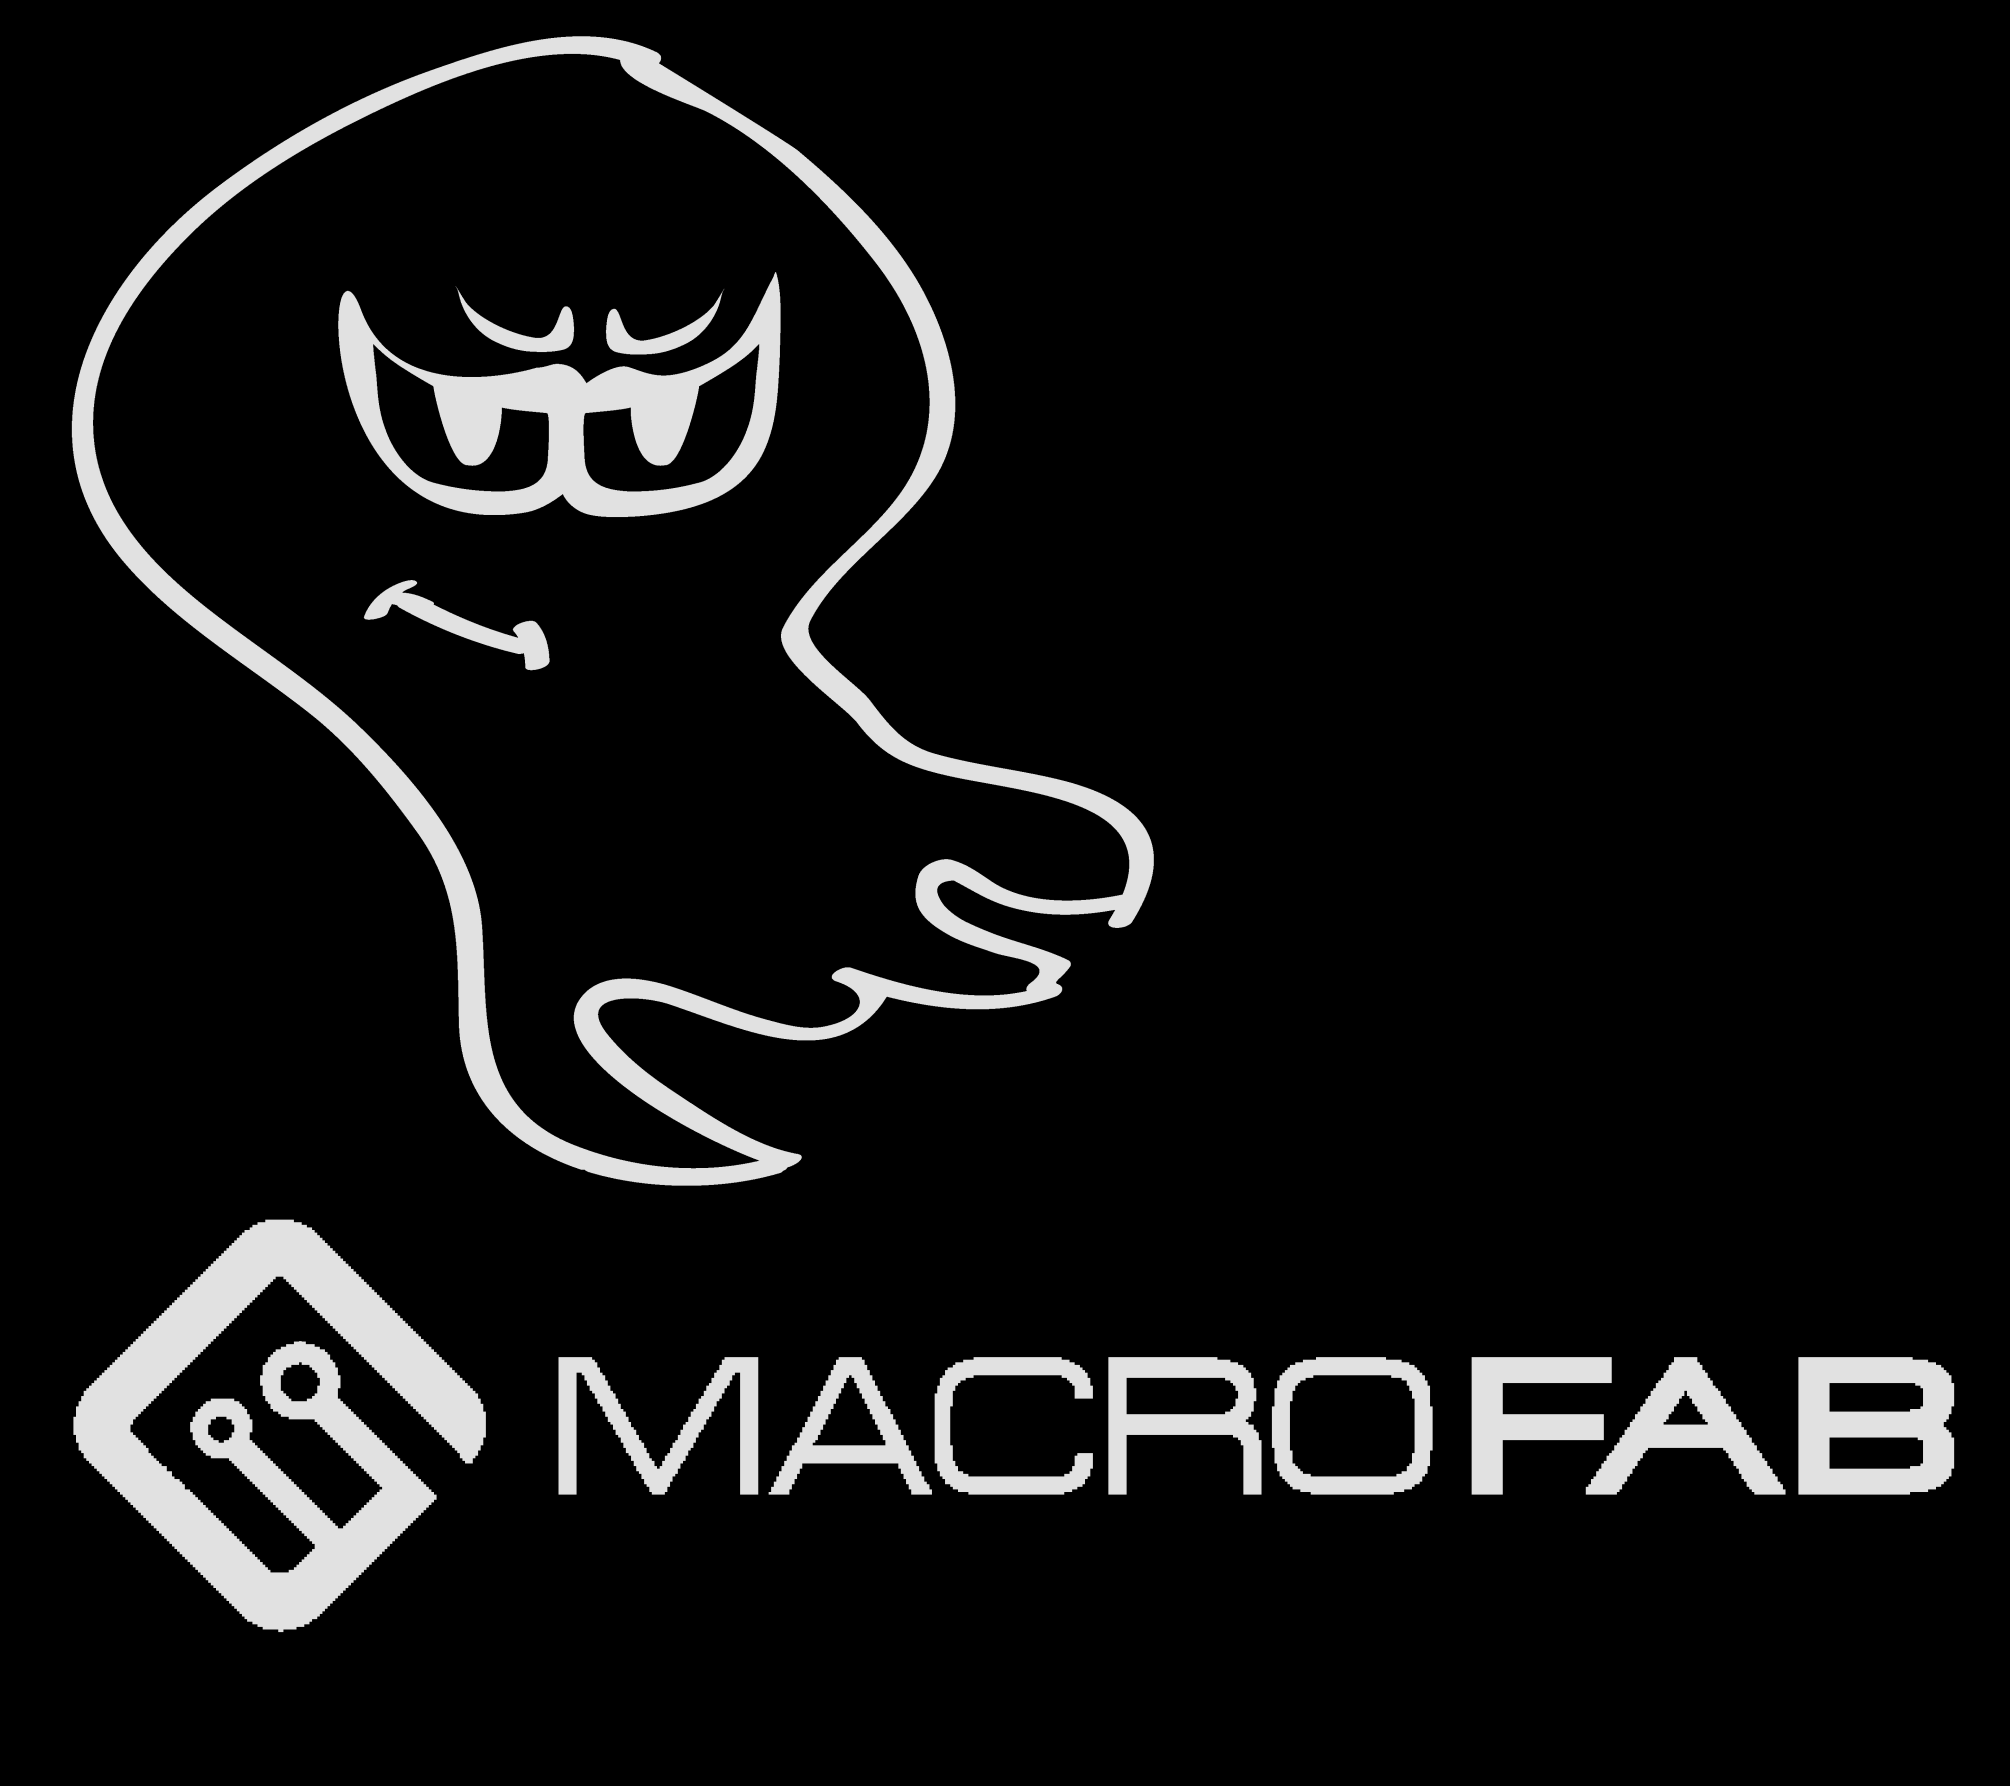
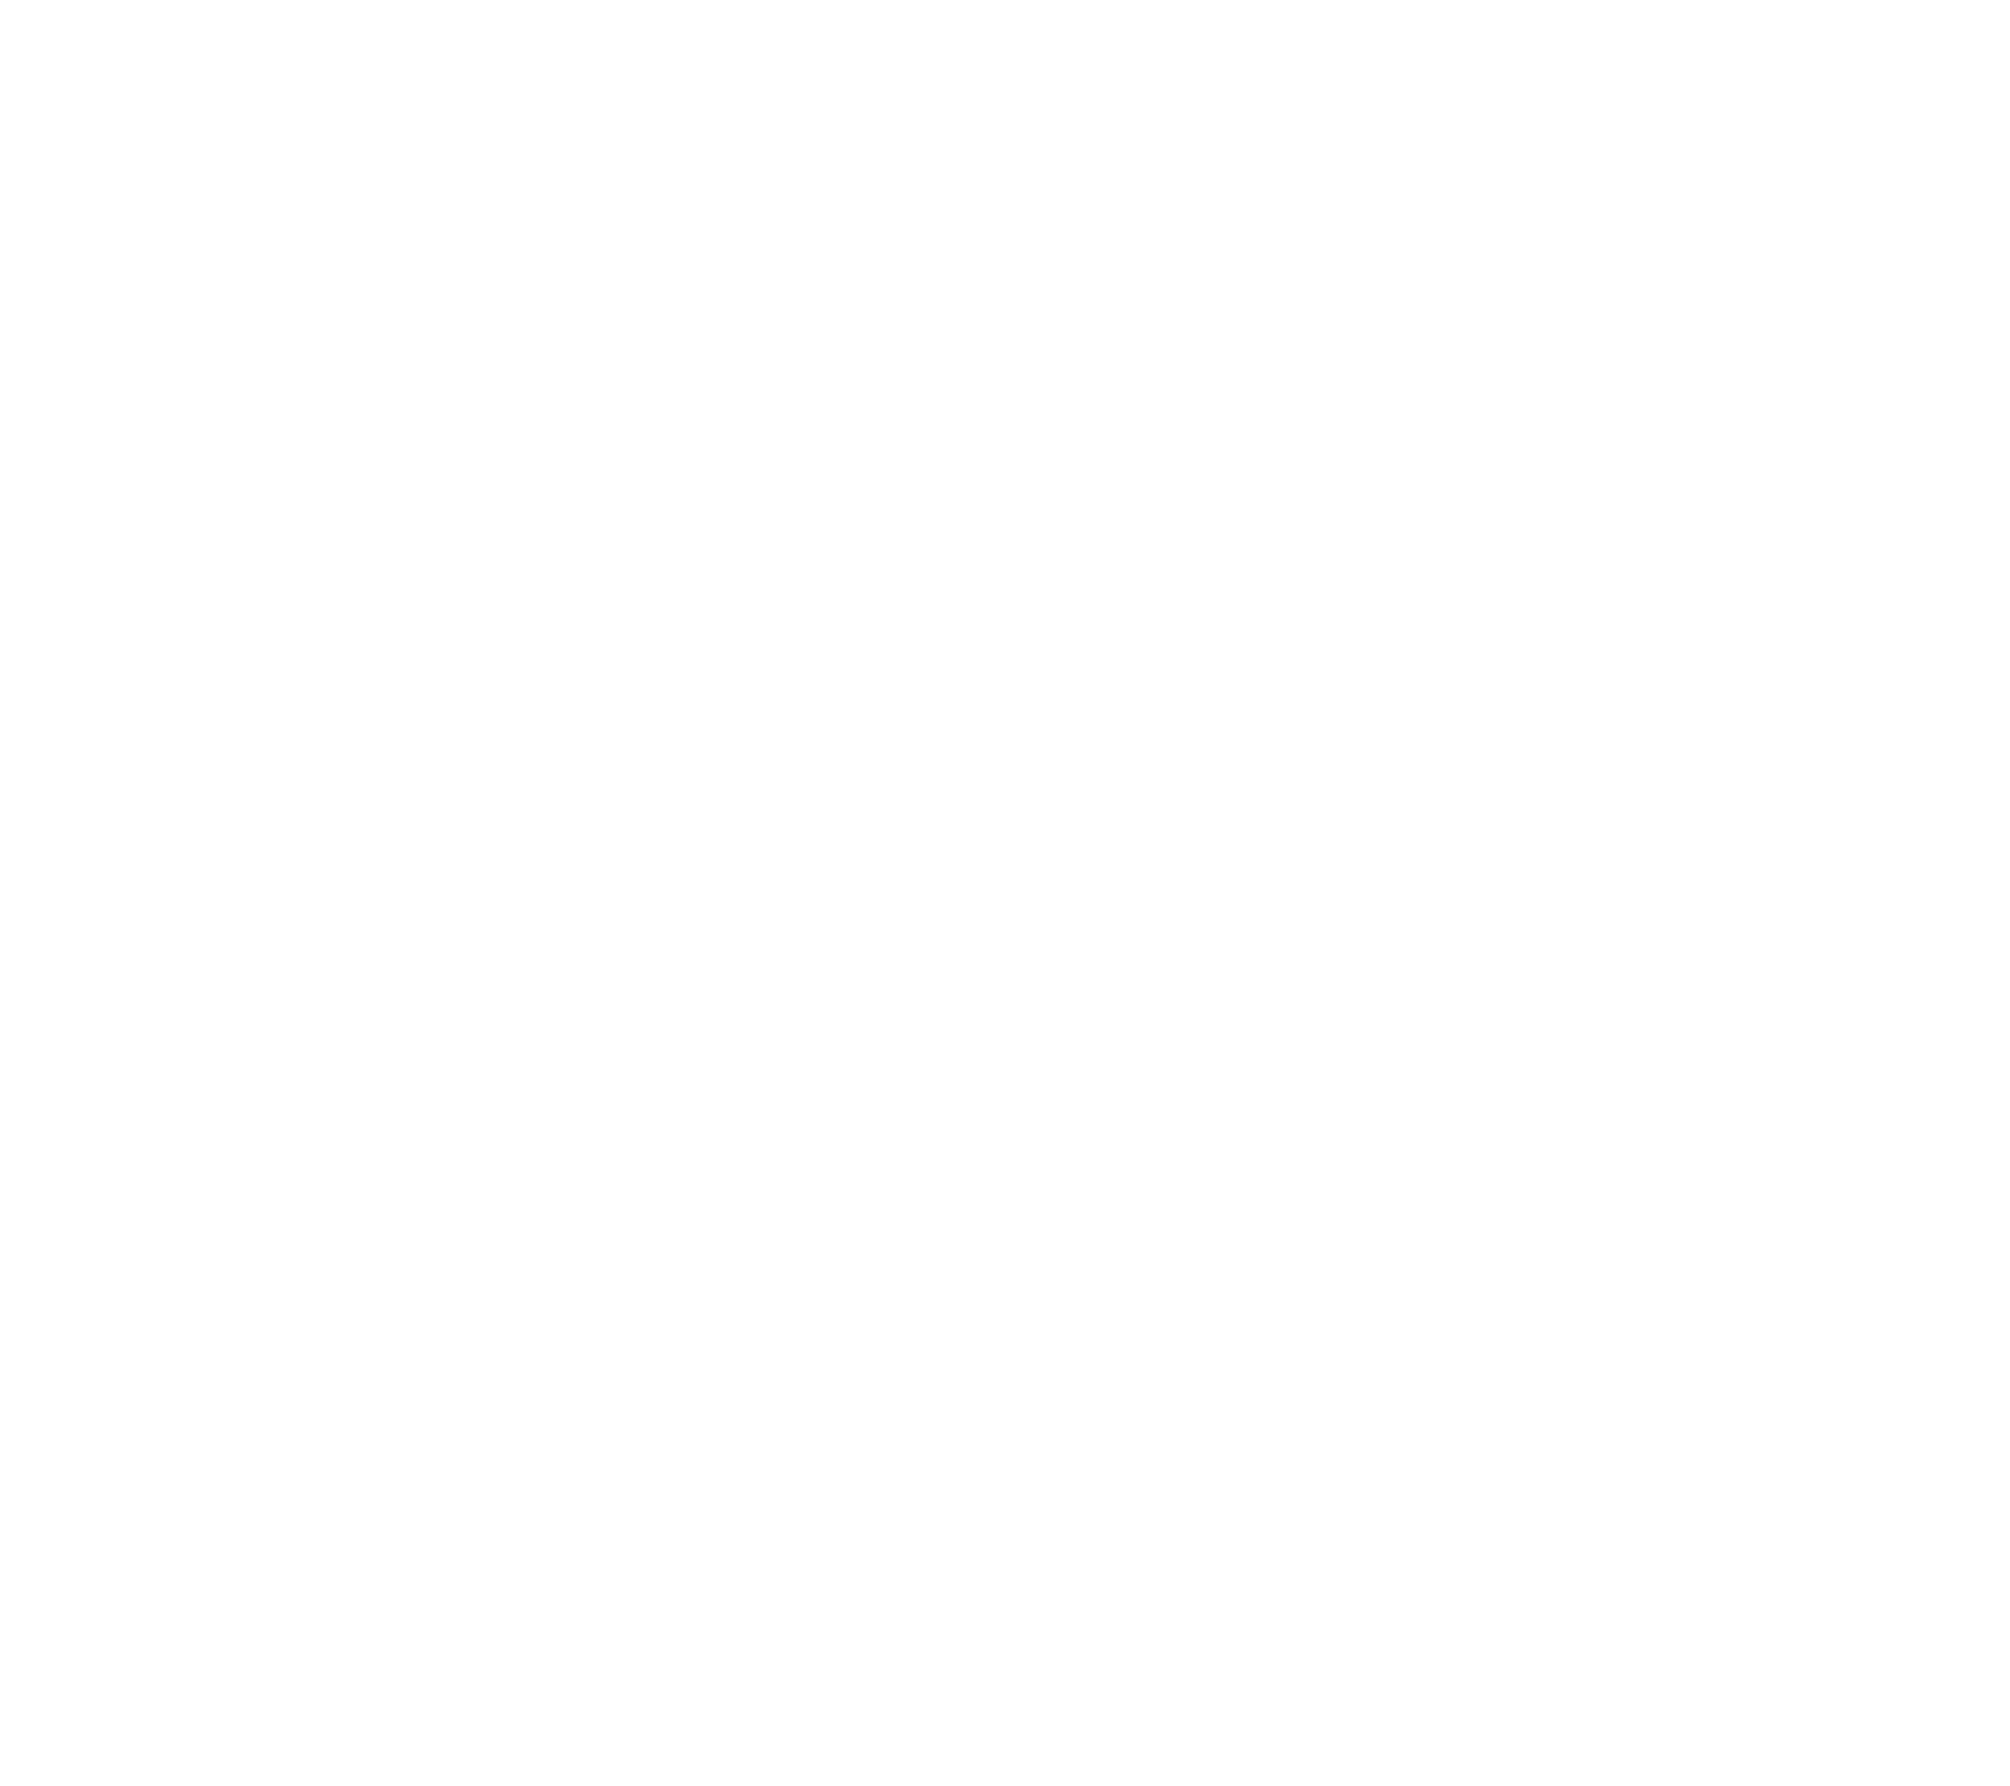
drawing: [71, 36, 1955, 1633] -> none

